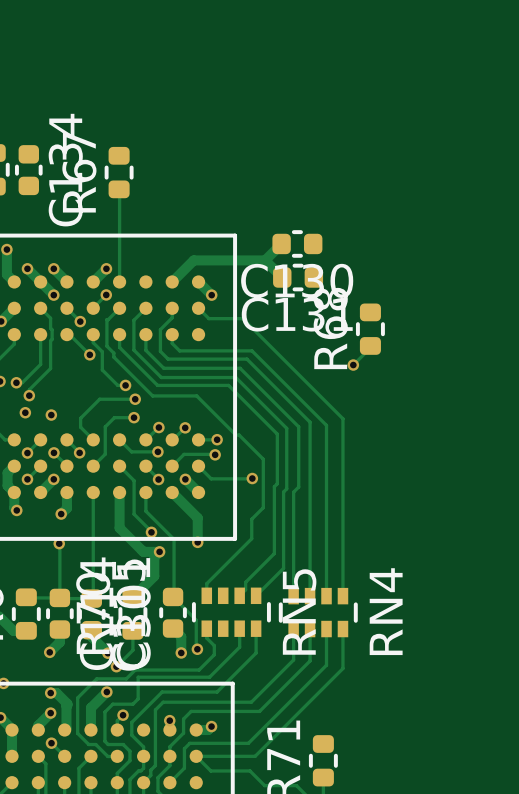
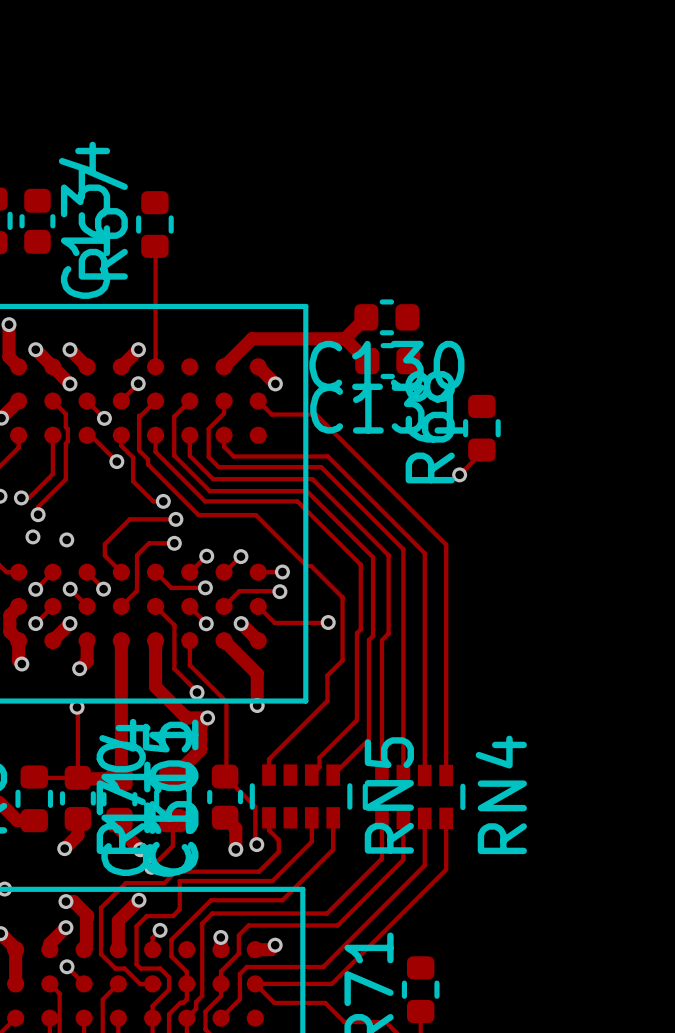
track width: thin (93, 492) (93, 597) (59, 597) -> thick (121, 640) (121, 776) (119, 778) (77, 777)

